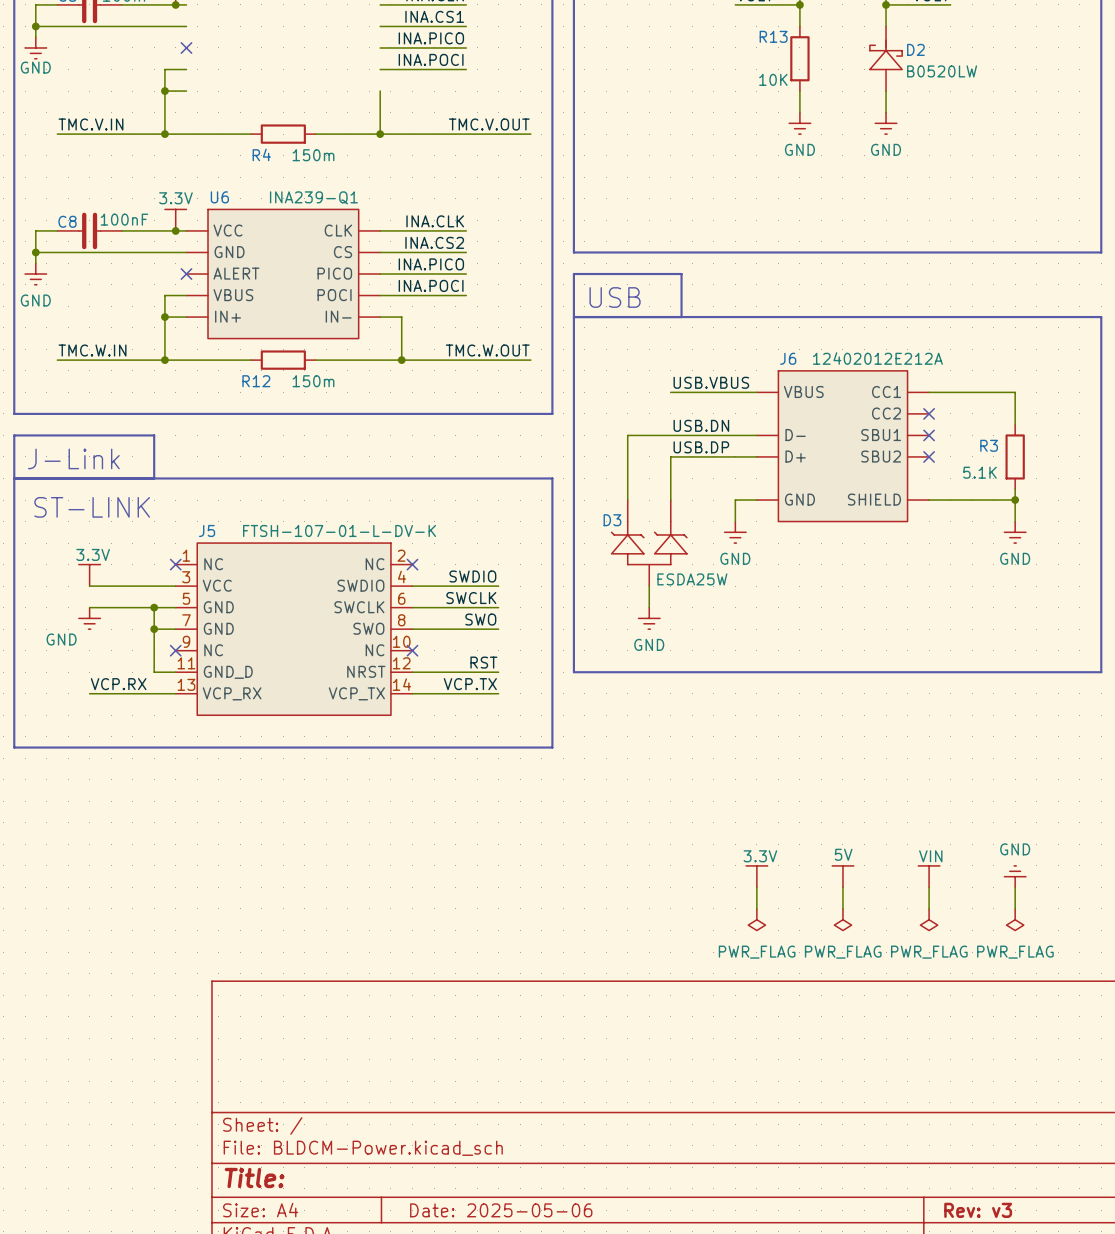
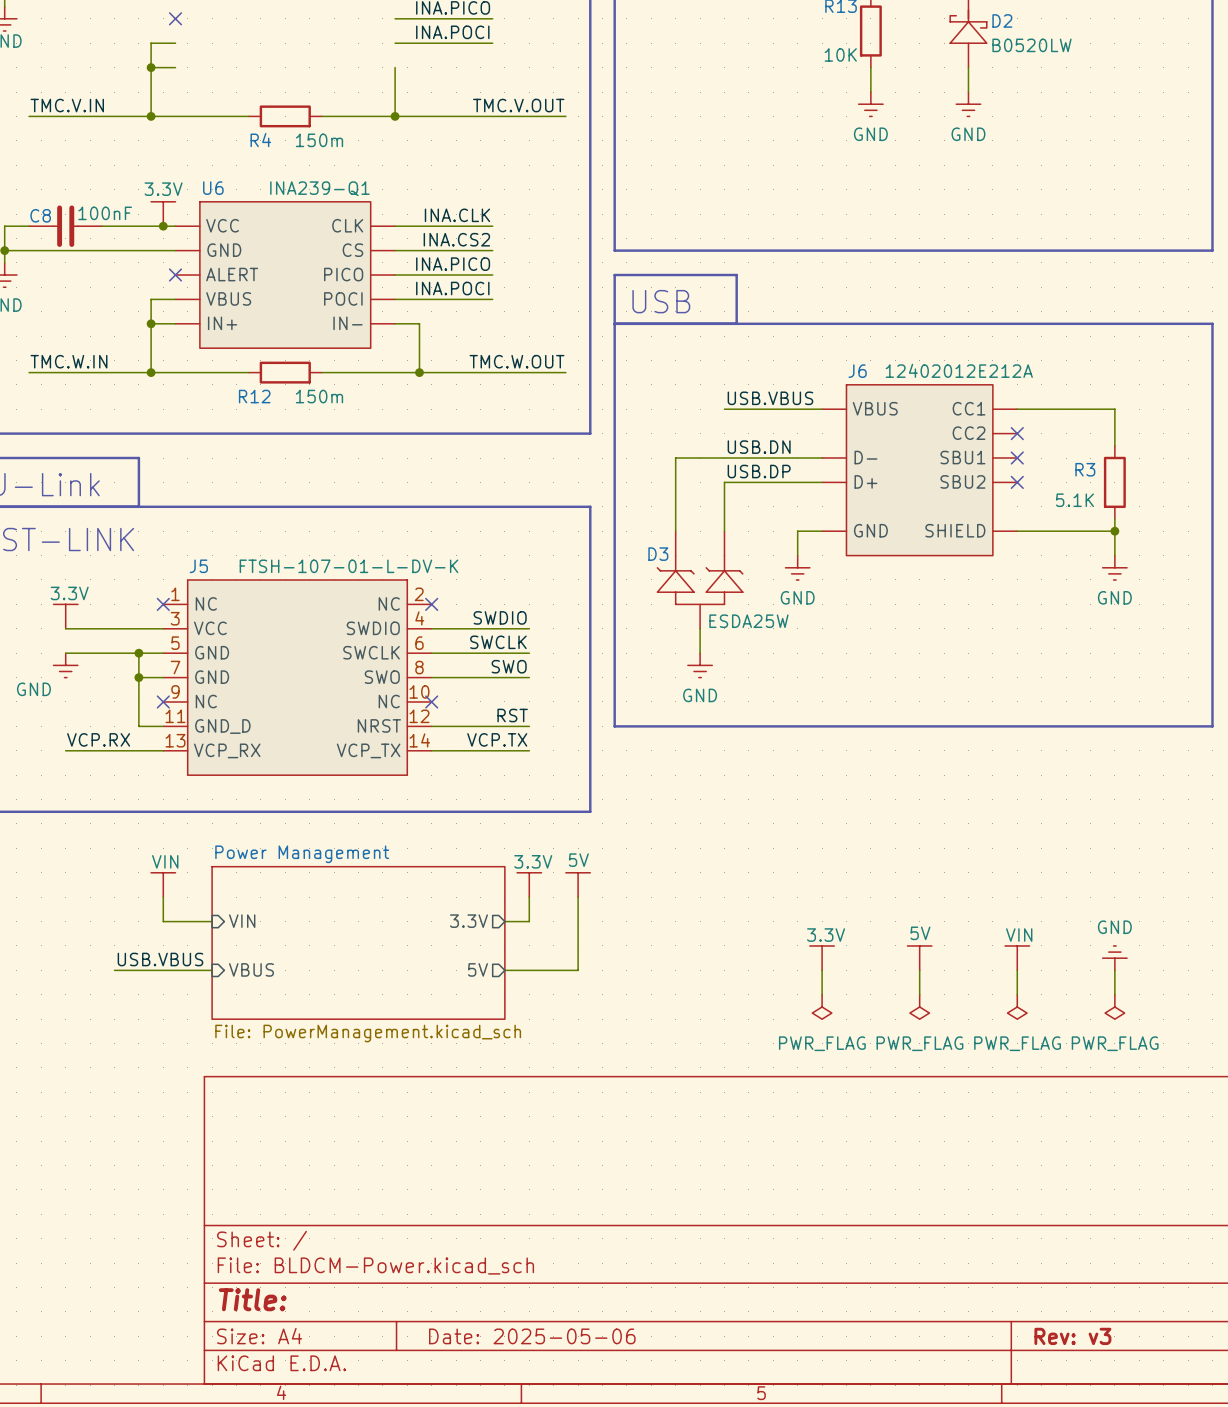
power symbol: none -> VIN (163, 884)
power symbol: none -> 3.3V (529, 884)
power symbol: none -> 5V (578, 884)
wire: none -> (163, 897) (163, 921) (212, 921)
wire: none -> (529, 897) (529, 921) (504, 921)
wire: none -> (578, 897) (578, 970) (504, 970)
sheet pin: none -> VIN (242, 921)
sheet pin: none -> 3.3V (468, 921)
sheet Power Management: none -> File: PowerManagement.kicad_sch (358, 942)
label: none -> USB.VBUS (160, 959)
wire: none -> (114, 970) (212, 970)
sheet pin: none -> VBUS (251, 969)
sheet pin: none -> 5V (477, 969)

